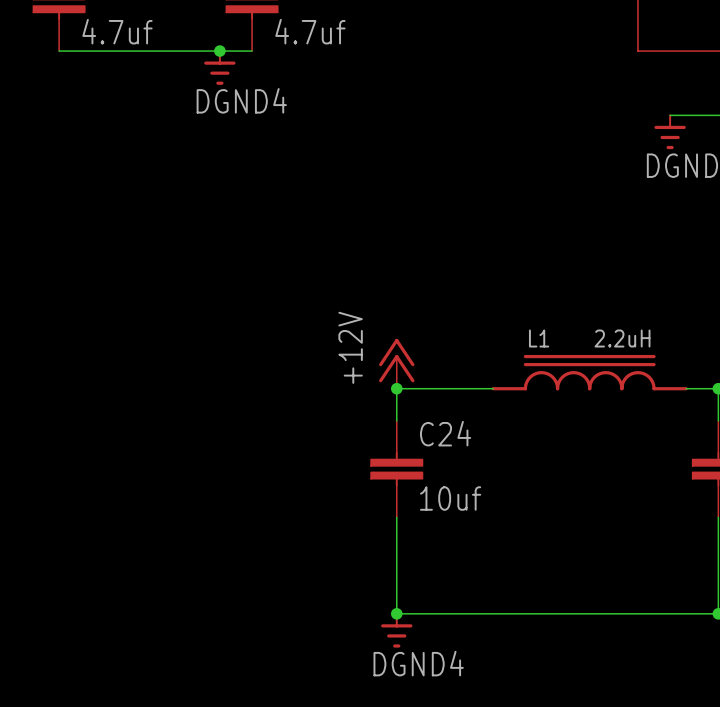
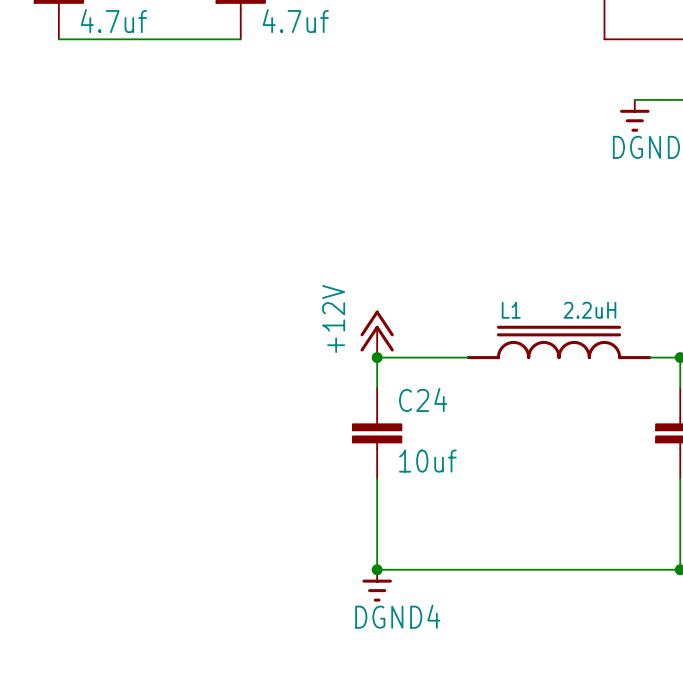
junction: (219, 51) -> none
power symbol: DGND4 (219, 67) -> none

